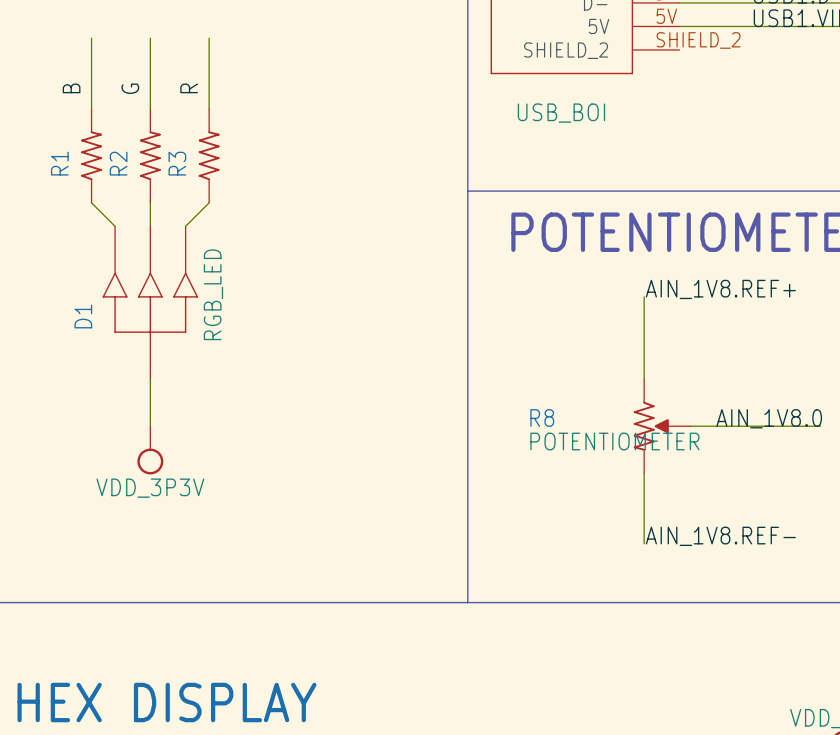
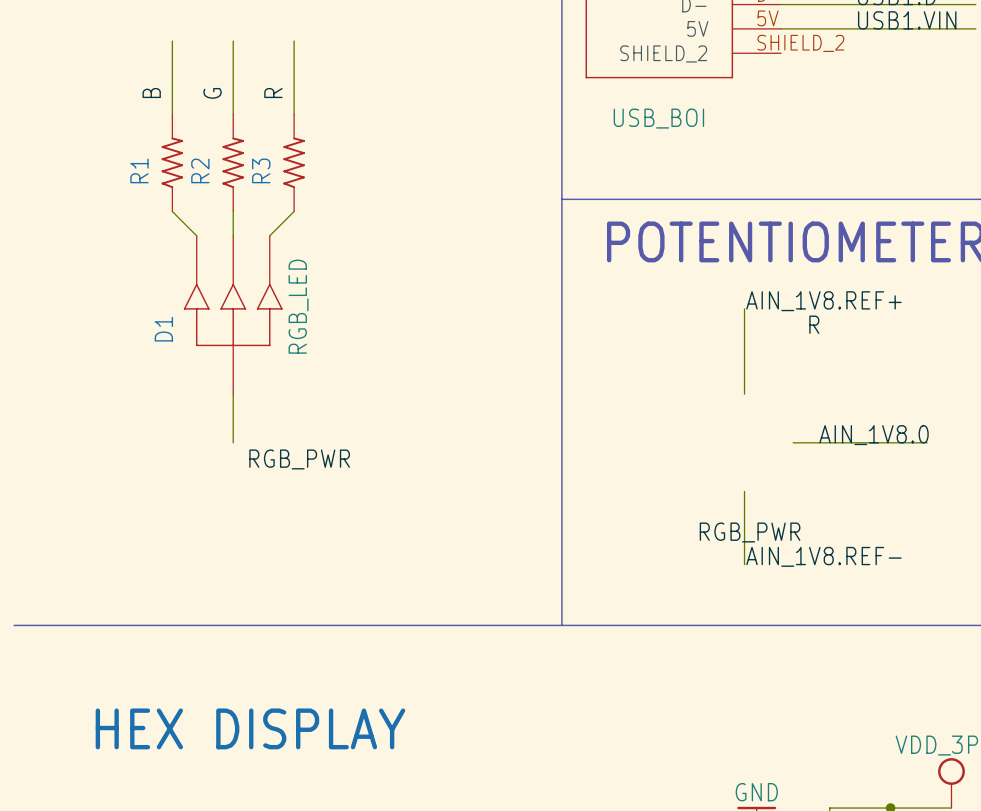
label: none -> R (814, 324)
R8: POTENTIOMETER (662, 426) -> none
label: none -> RGB_PWR (299, 459)
power symbol: VDD_3P3V (150, 450) -> none
label: none -> RGB_PWR (750, 532)

